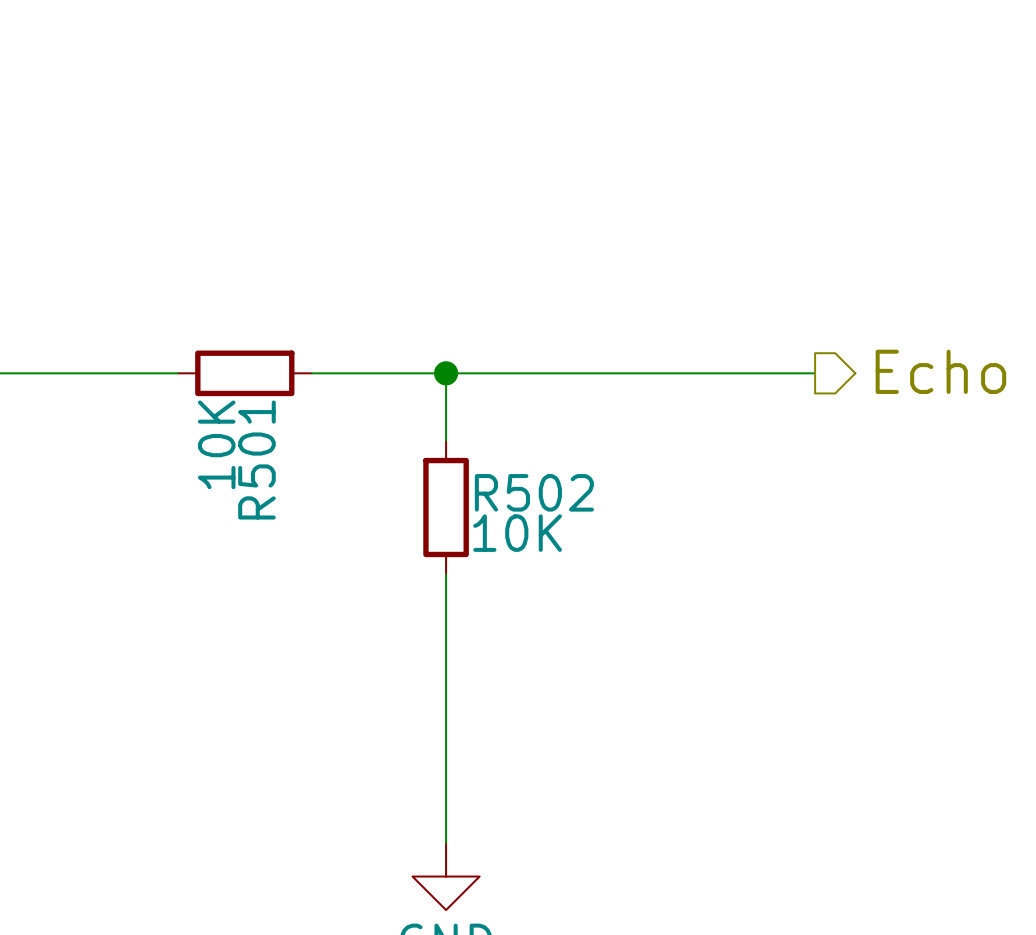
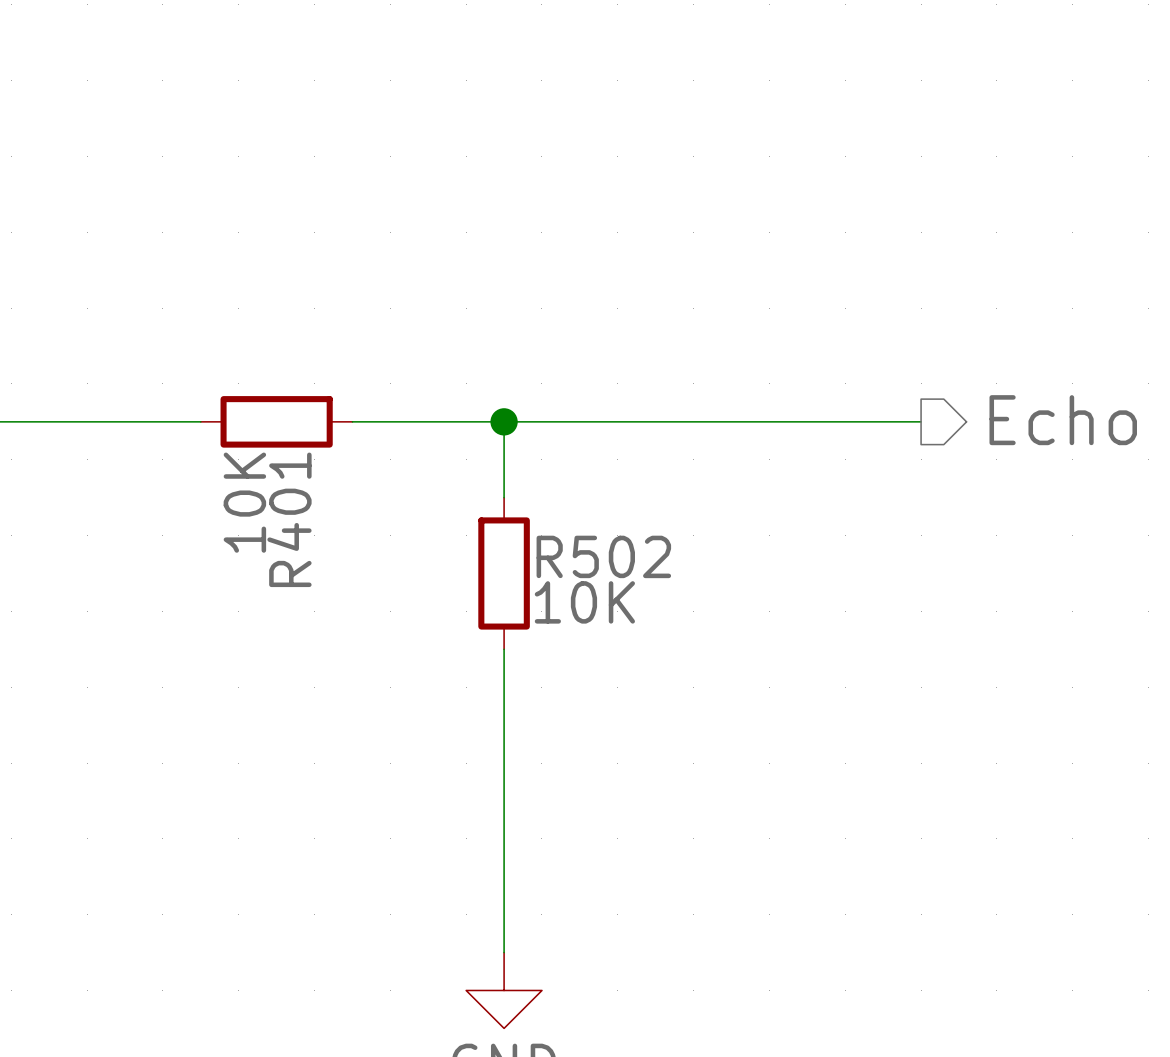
R501 name: R501 (256, 460) -> R401 (289, 519)

